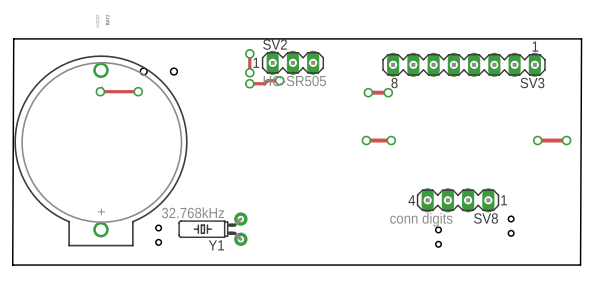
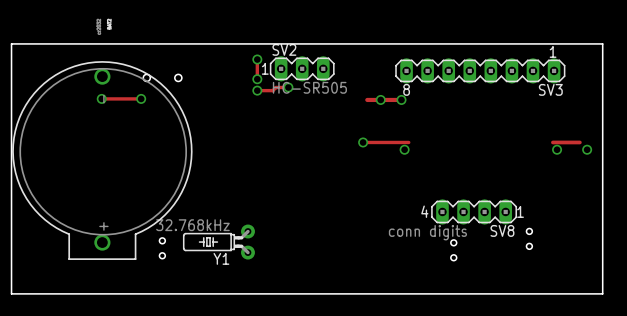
board edge: (13, 38) (12, 265) (580, 265) (581, 38) -> (11, 43) (11, 293) (602, 293) (602, 43)
track: none -> (367, 99) (380, 99)
track: none -> (363, 142) (408, 142)
track: none -> (552, 142) (579, 142)
track: (366, 140) (391, 140) -> none
via position: (366, 140) -> (363, 142)
track: (538, 140) (566, 140) -> none

